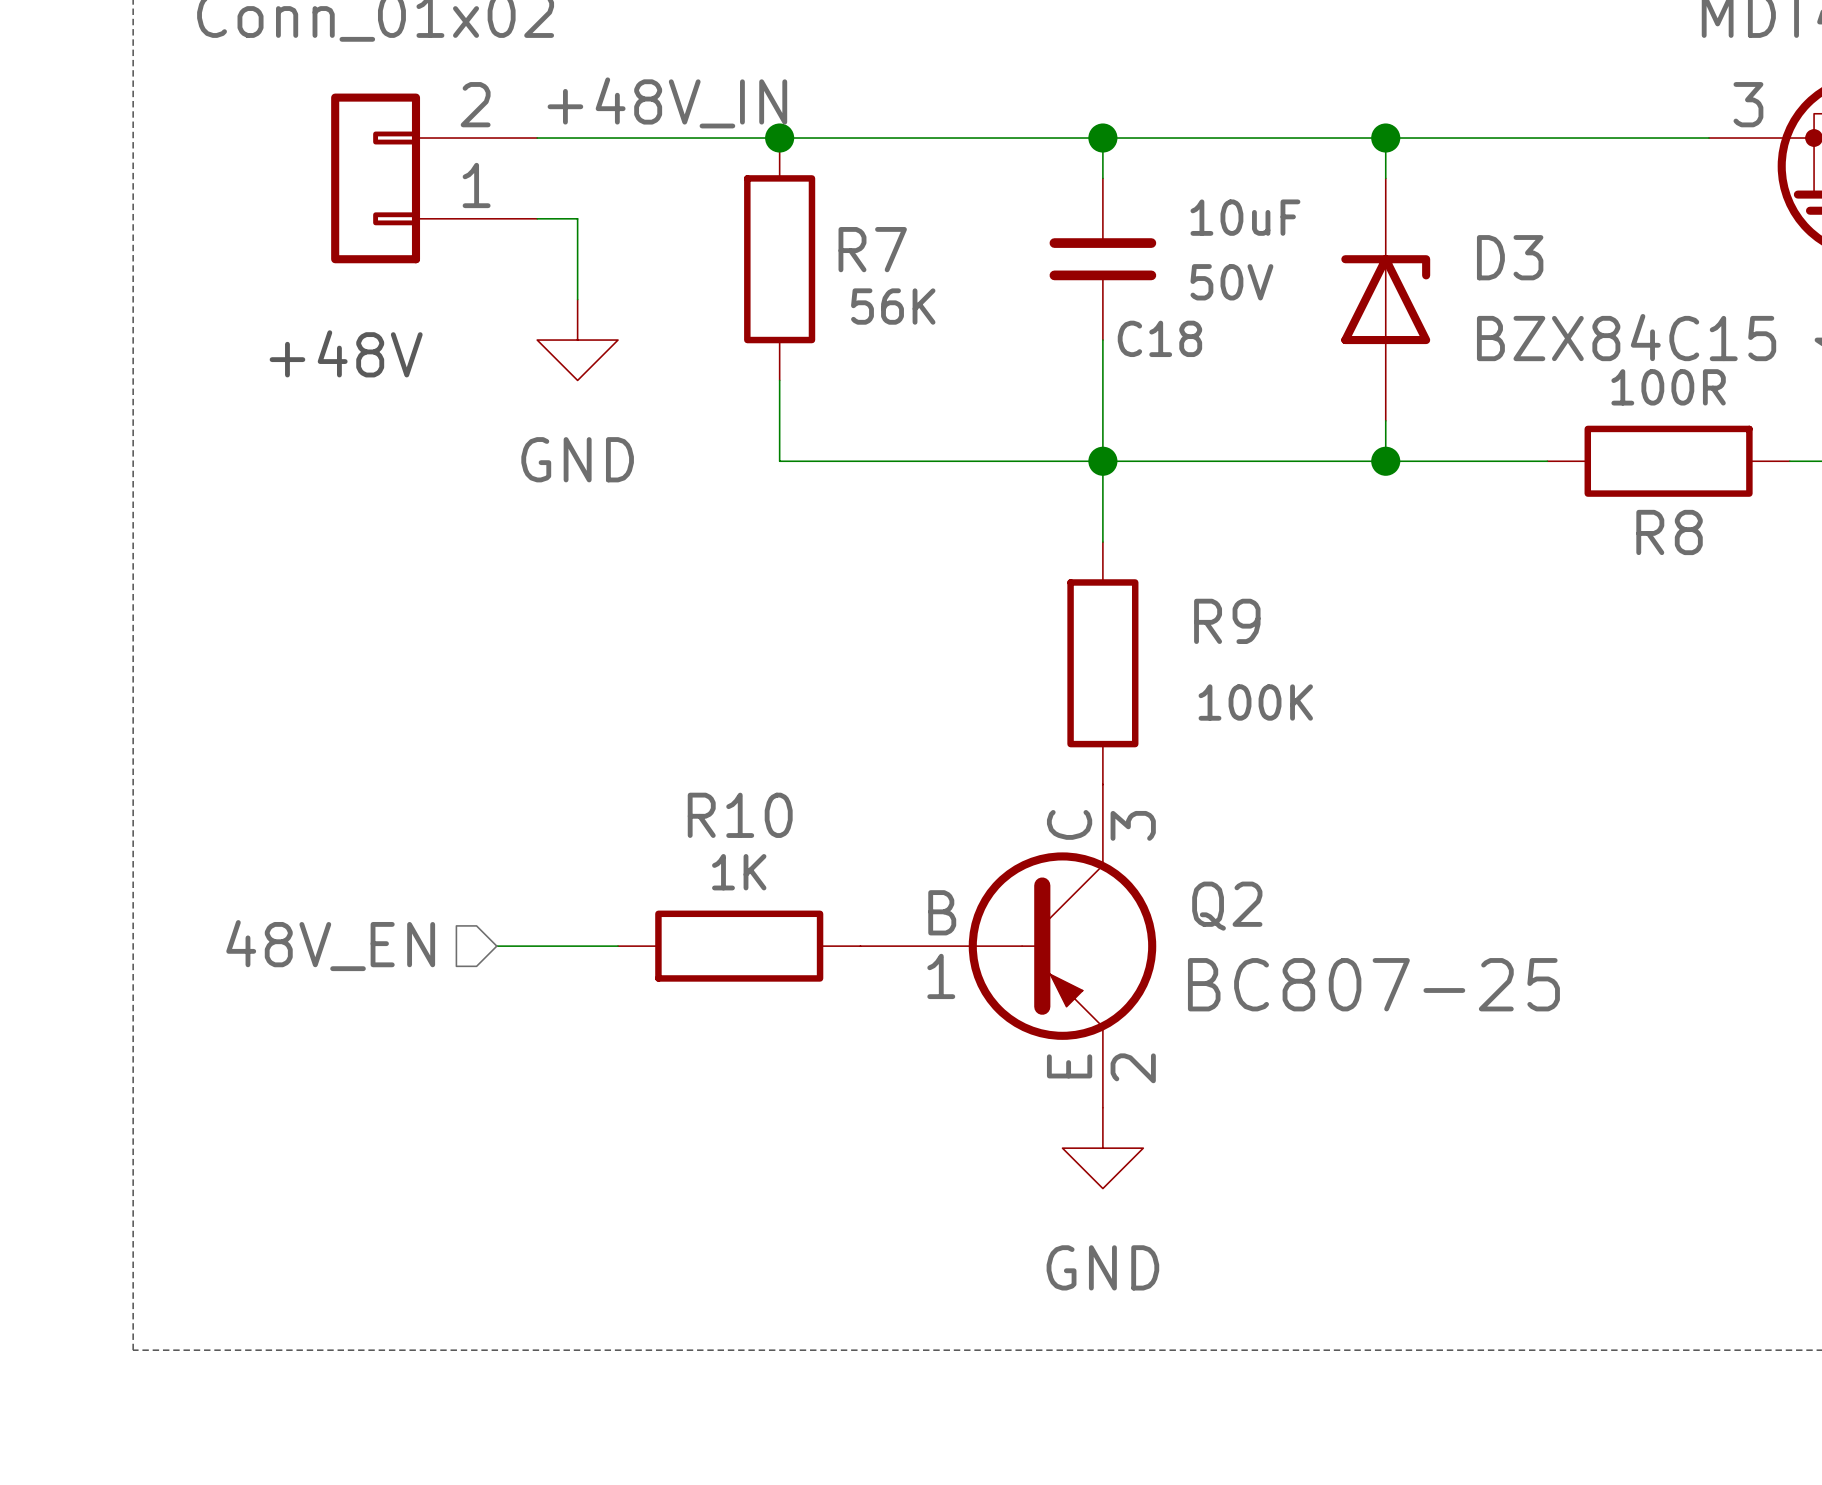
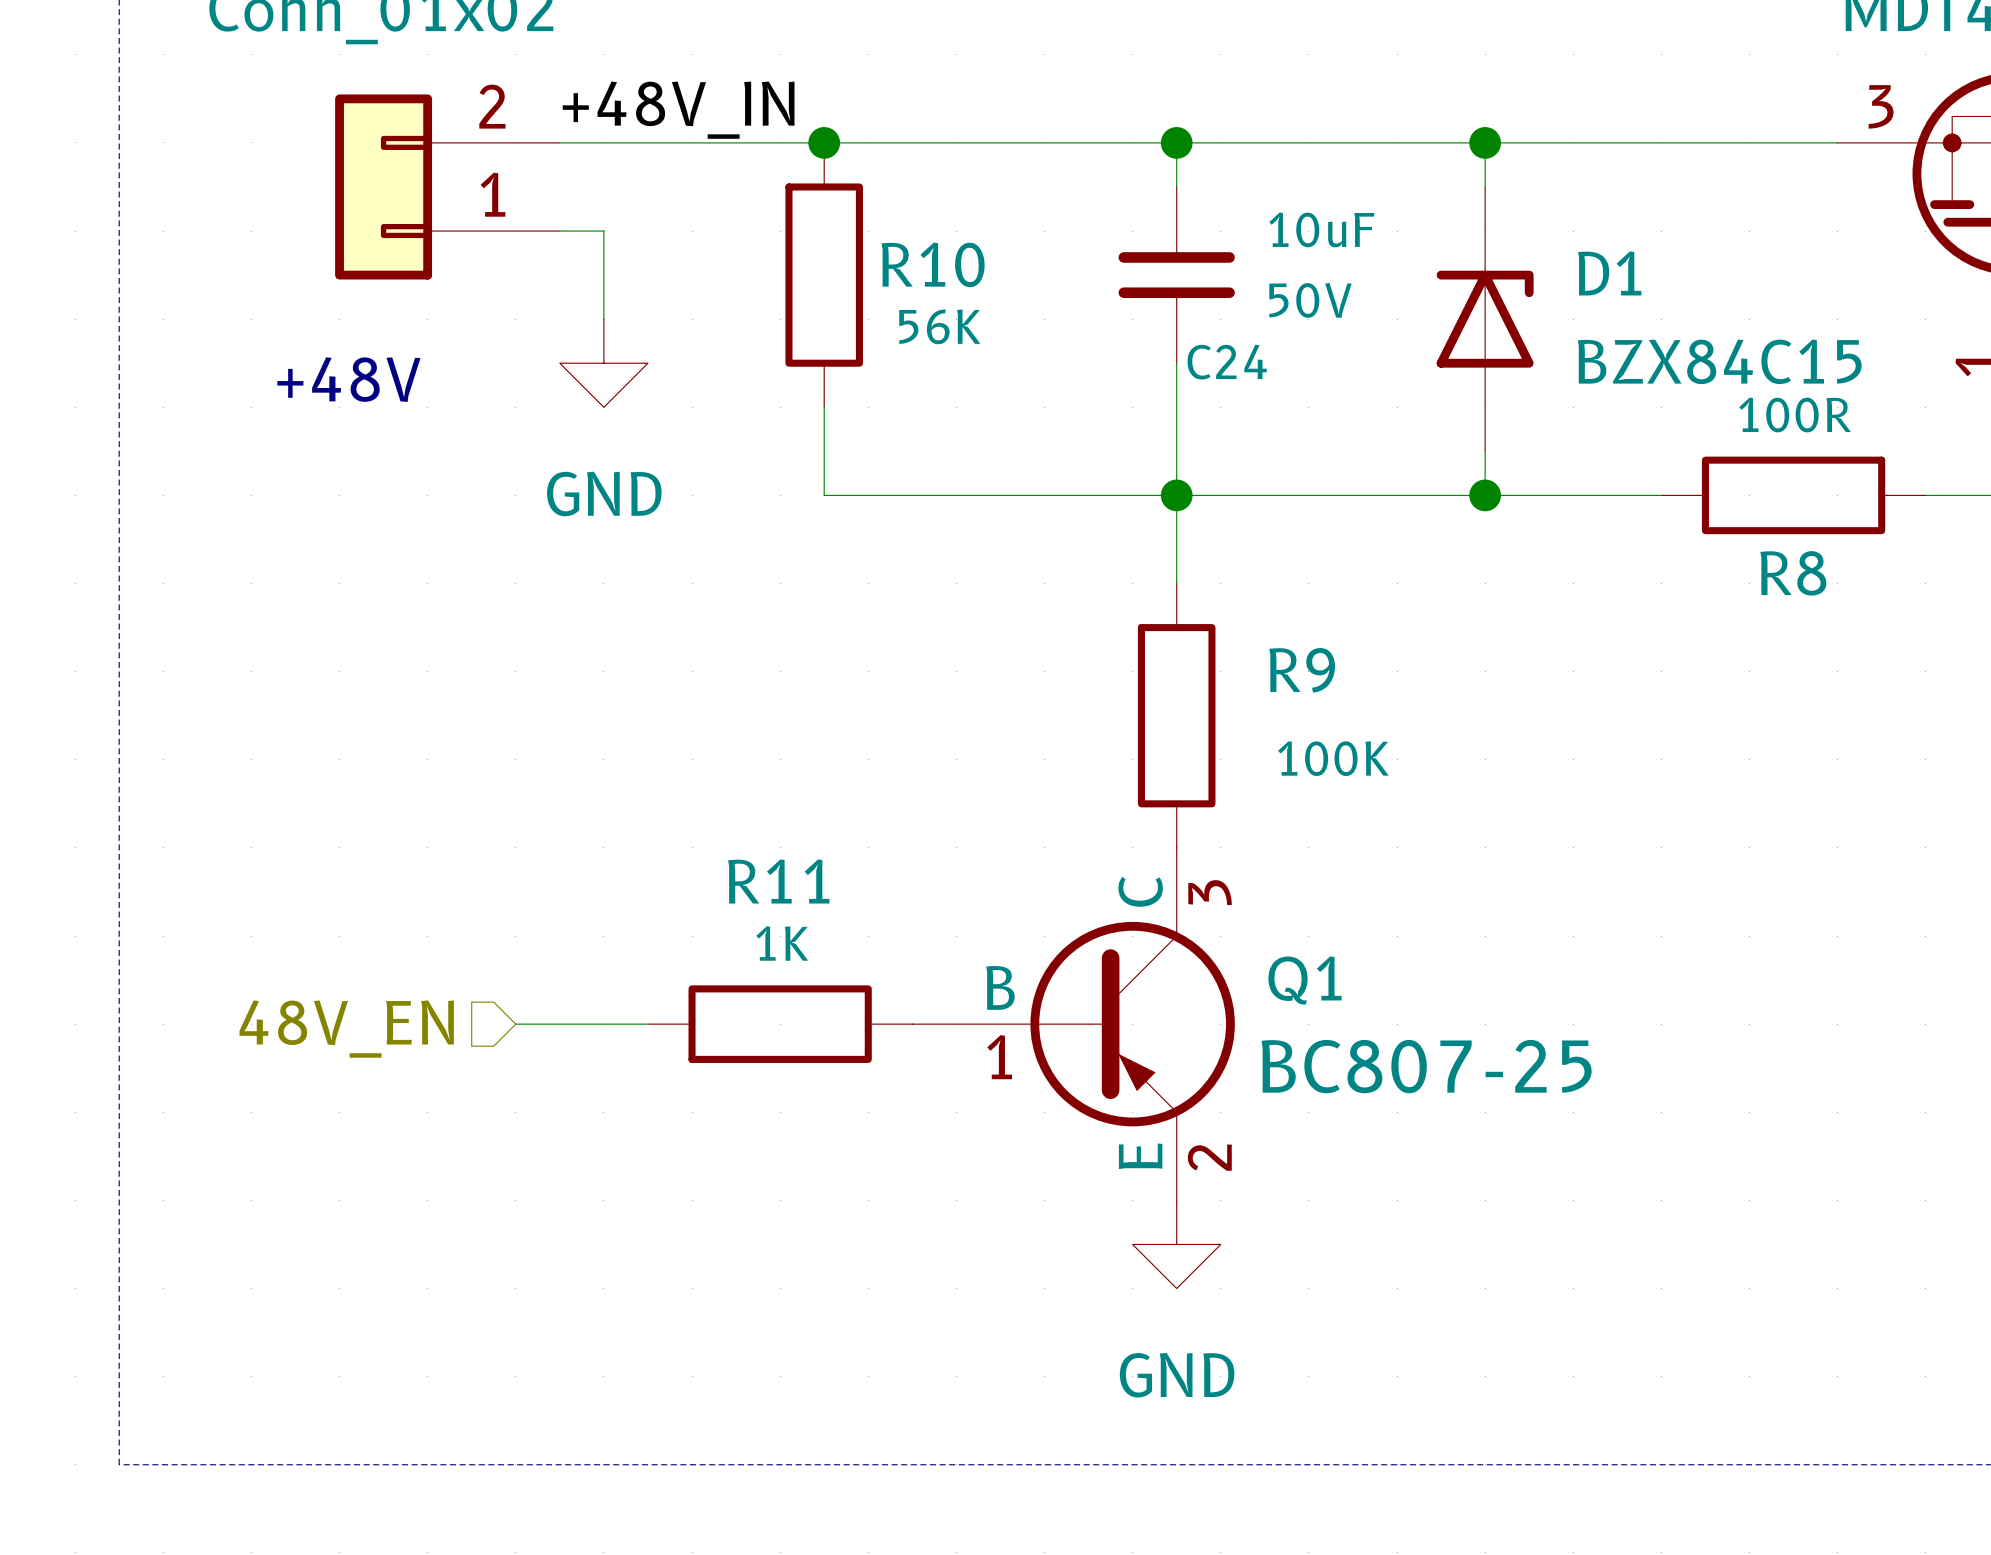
R7 name: R7 (872, 249) -> R10 (933, 264)
D3 name: D3 (1510, 257) -> D1 (1609, 273)
C18 name: C18 (1159, 338) -> C24 (1227, 362)
R10 name: R10 (740, 815) -> R11 (778, 881)
Q2 name: Q2 (1227, 906) -> Q1 (1305, 980)

